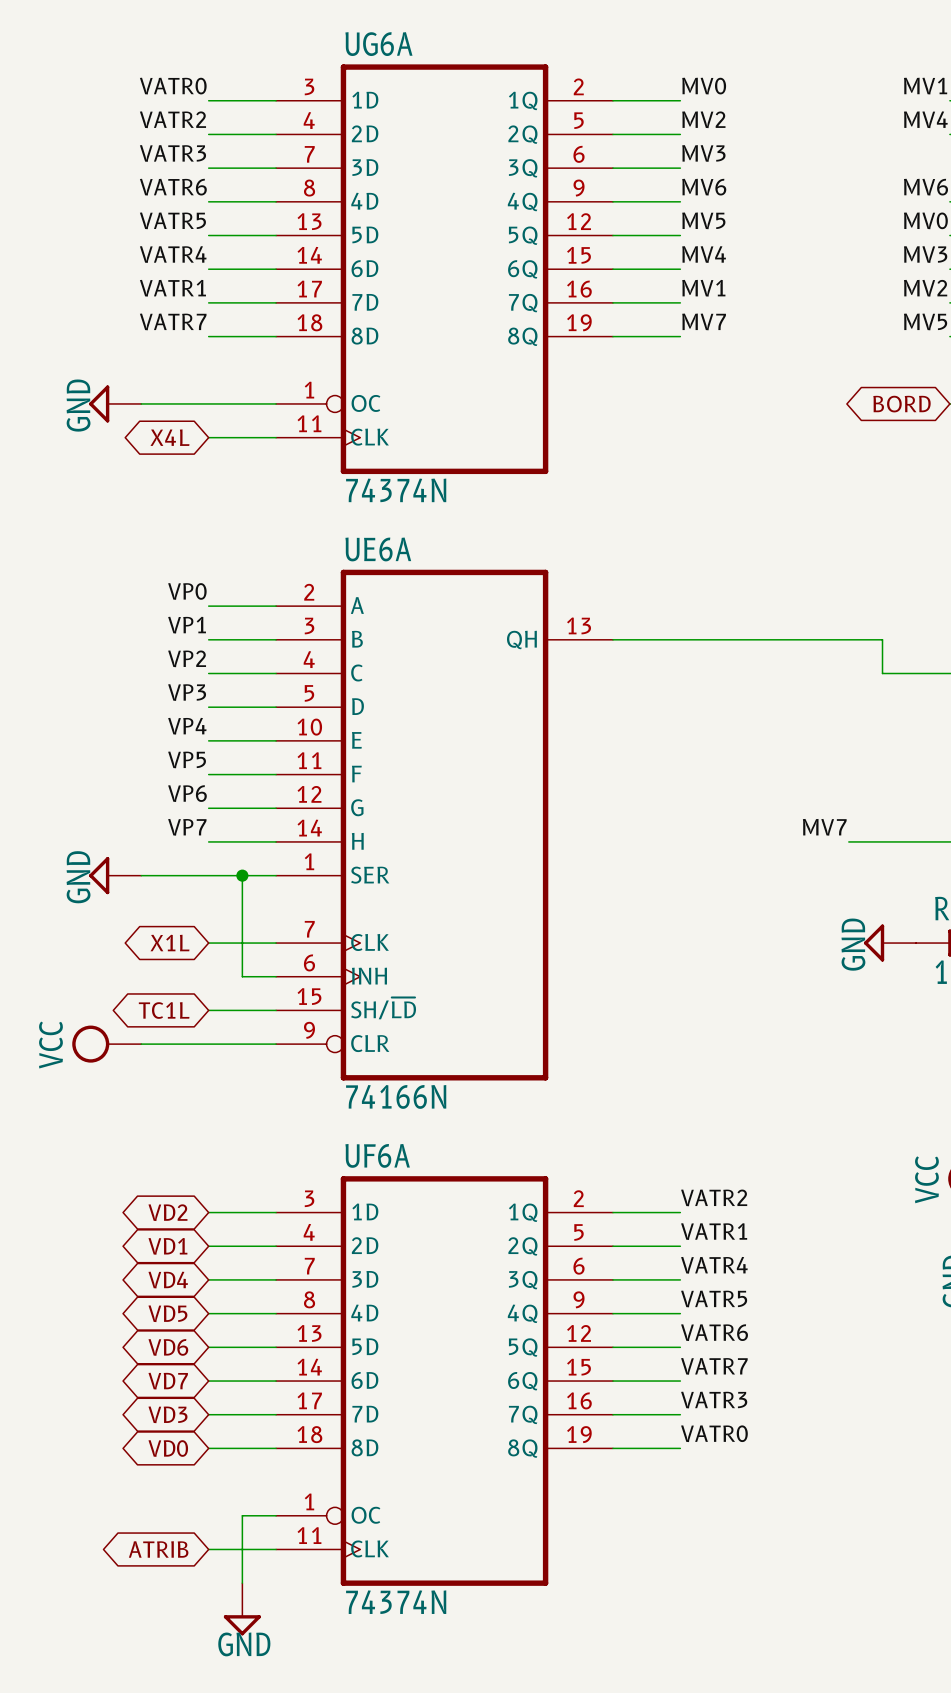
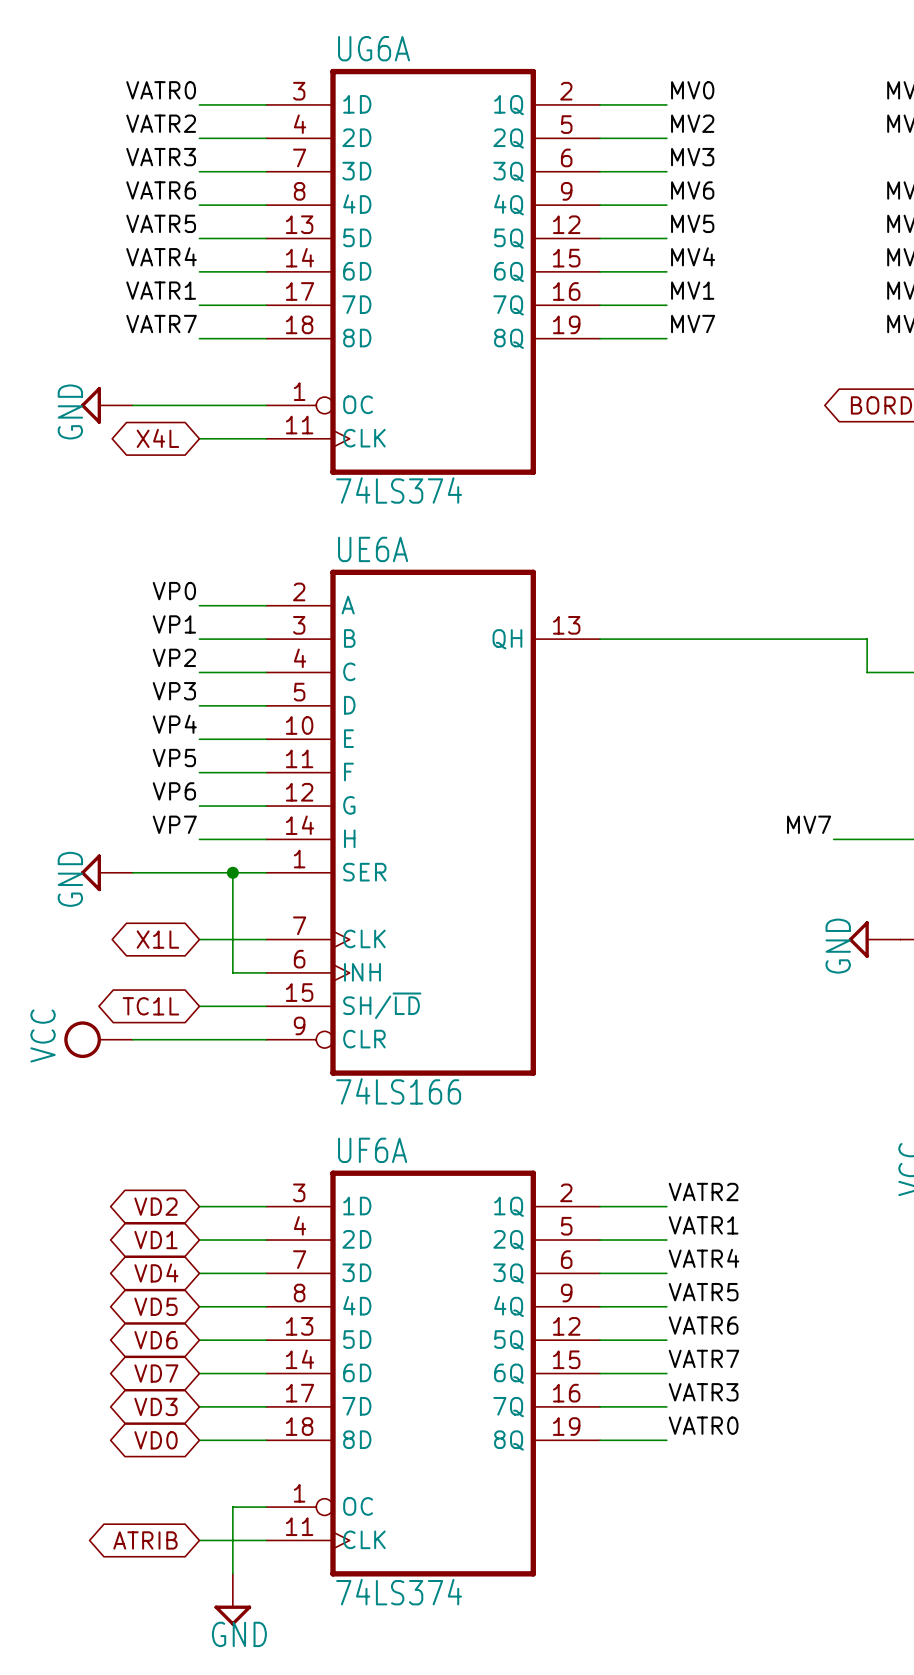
UG6A value: 74374N (396, 490) -> 74LS374 (399, 490)
UE6A value: 74166N (396, 1096) -> 74LS166 (398, 1091)
UF6A value: 74374N (396, 1602) -> 74LS374 (399, 1592)

